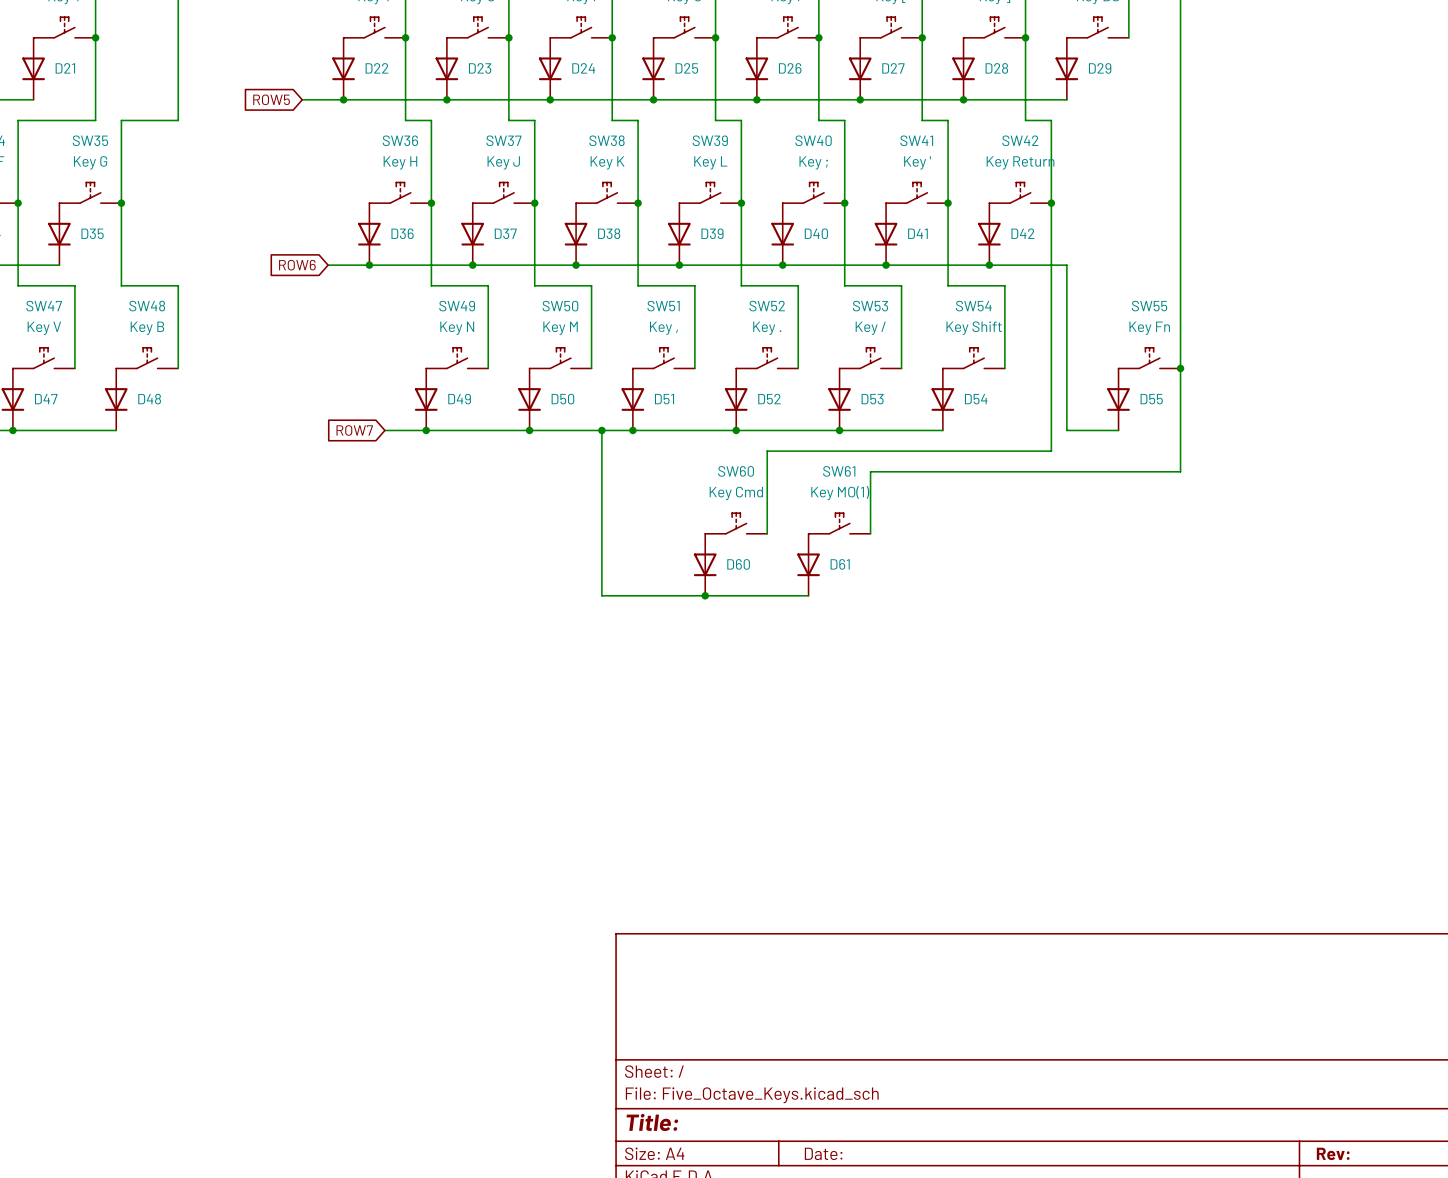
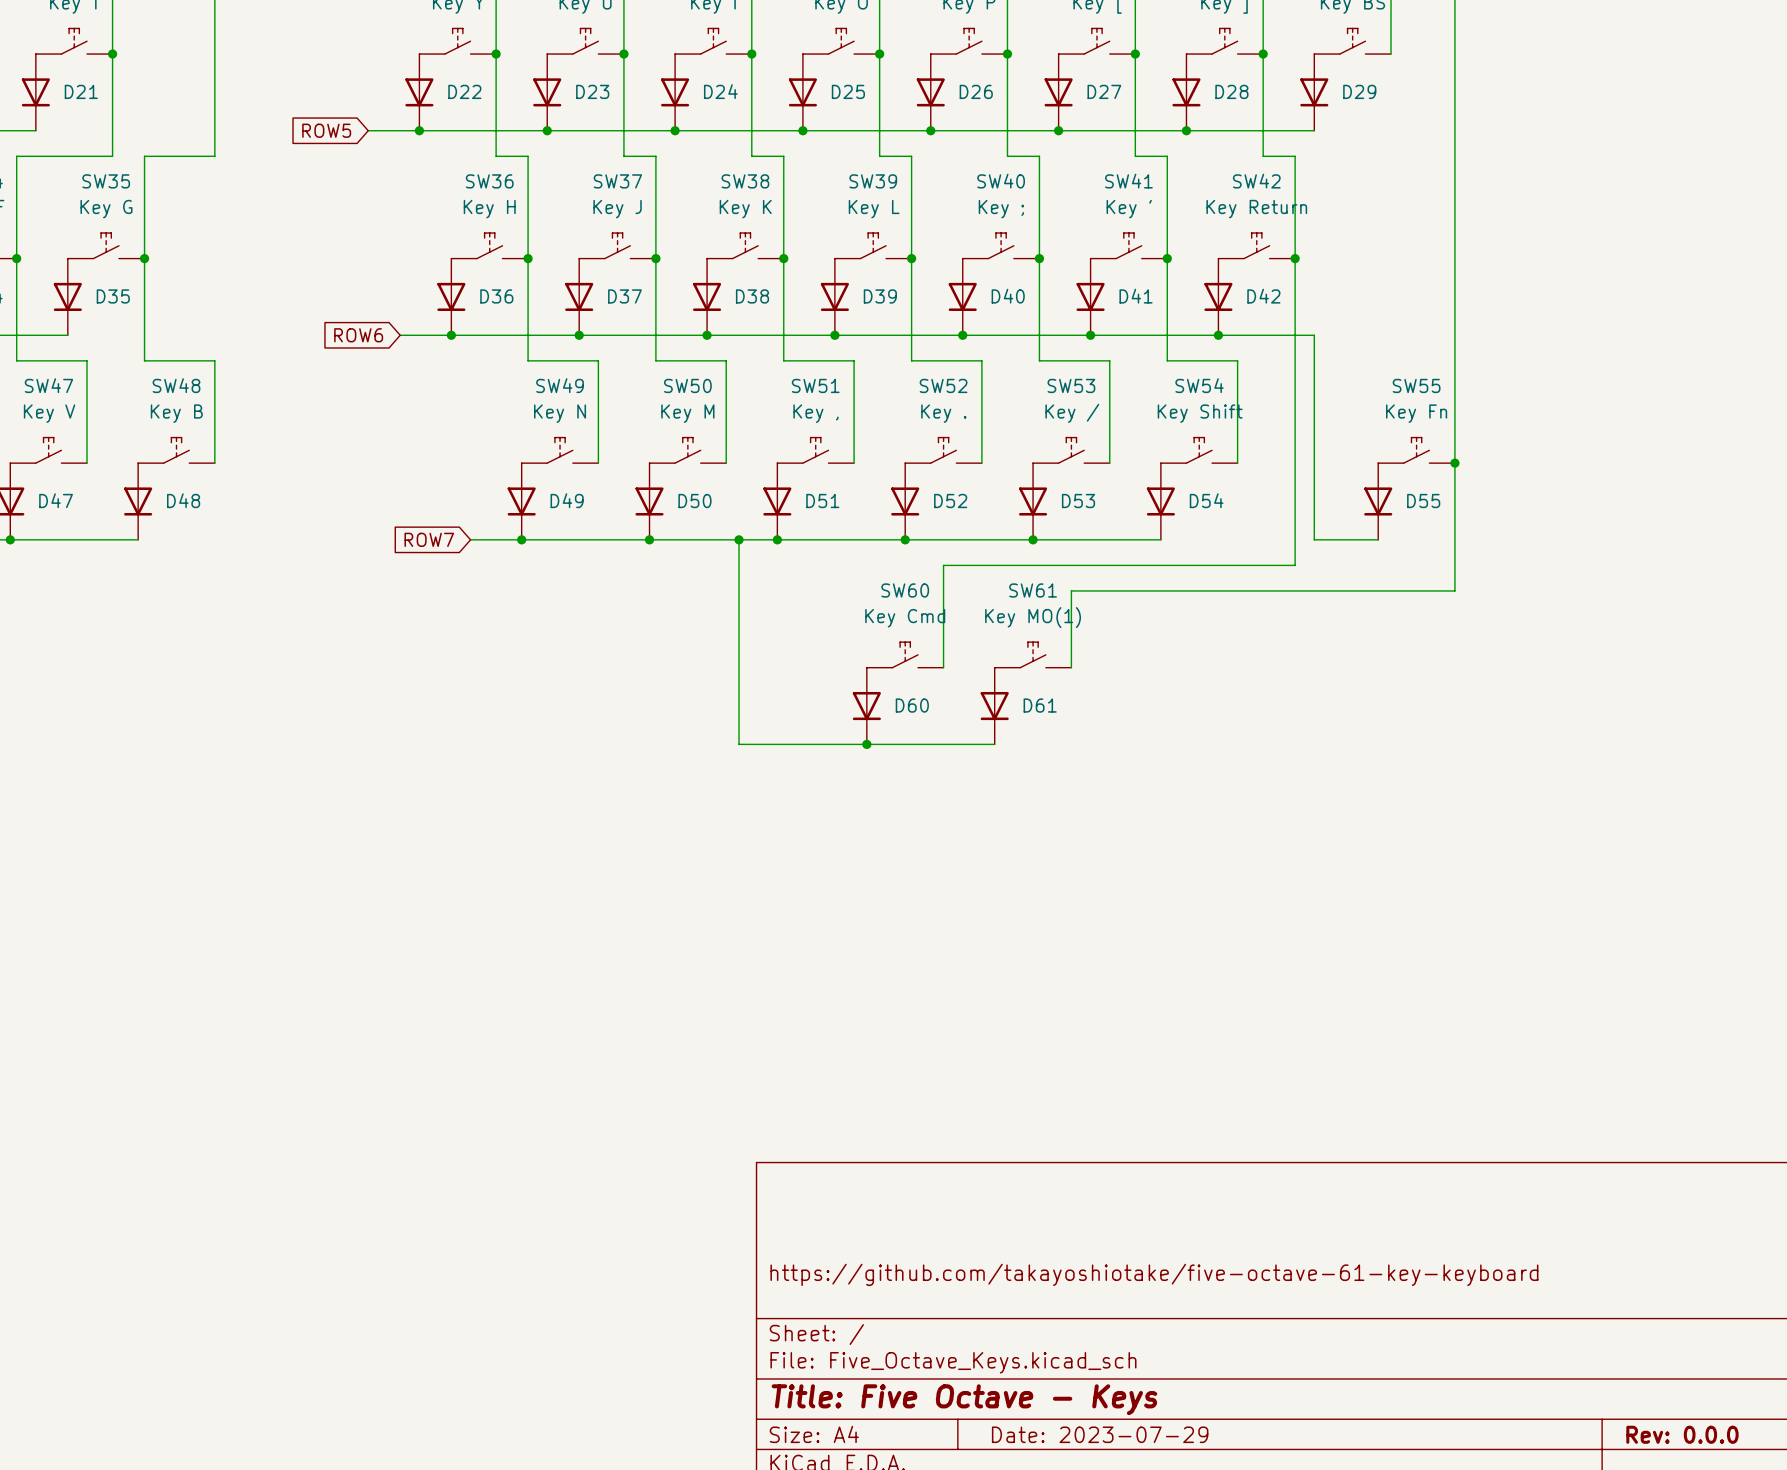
title block: none -> https://github.com/takayoshiotake/five-octave-61-key-keyboard (1154, 1274)
title block: Title: (652, 1122) -> Title: Five Octave - Keys (964, 1399)
title block: Date: (823, 1153) -> Date: 2023-07-29 (1100, 1434)
title block: Rev: (1333, 1153) -> Rev: 0.0.0 (1682, 1434)

